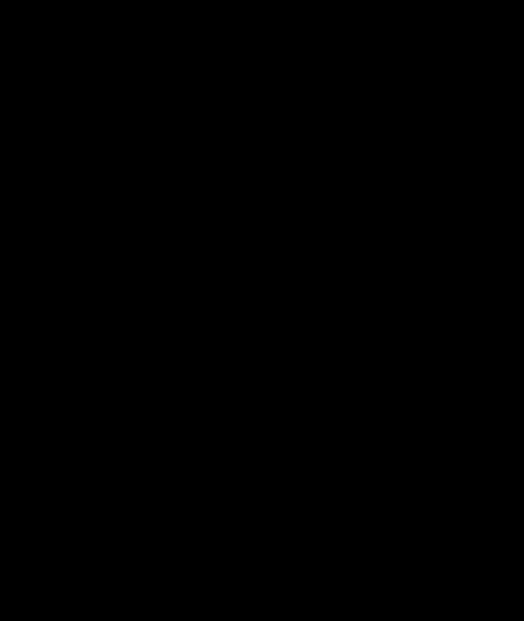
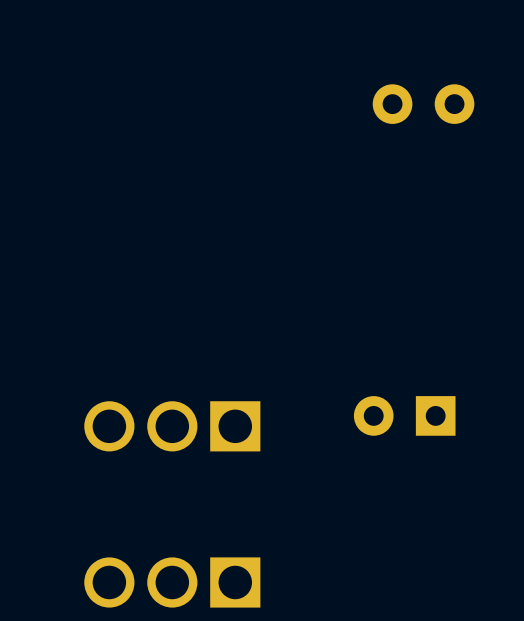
part: none -> (423, 104)
part: none -> (404, 415)
part: none -> (172, 426)
part: none -> (172, 582)

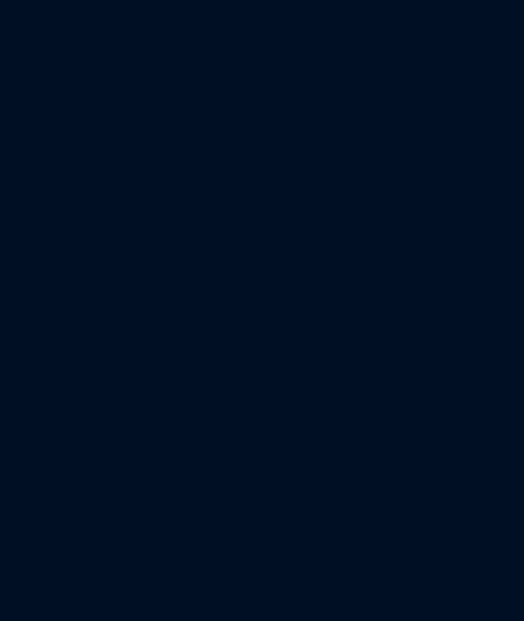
part: (423, 104) -> none
part: (404, 415) -> none
part: (172, 426) -> none
part: (172, 582) -> none

